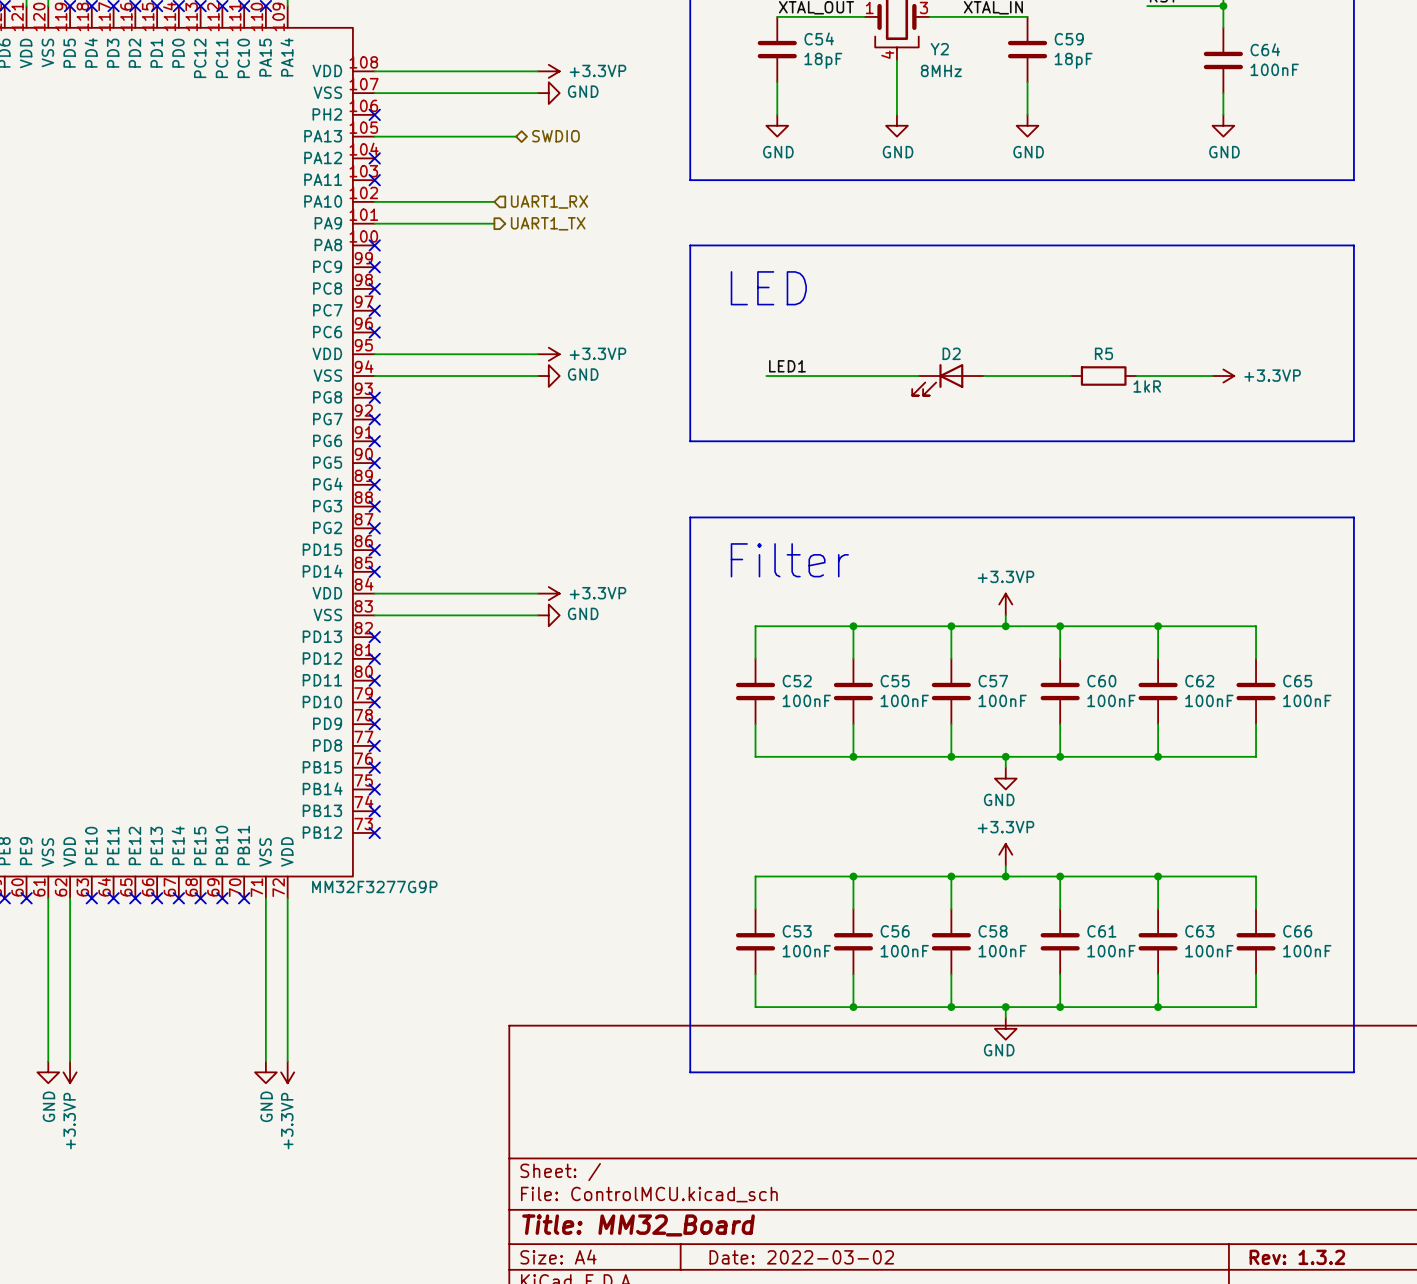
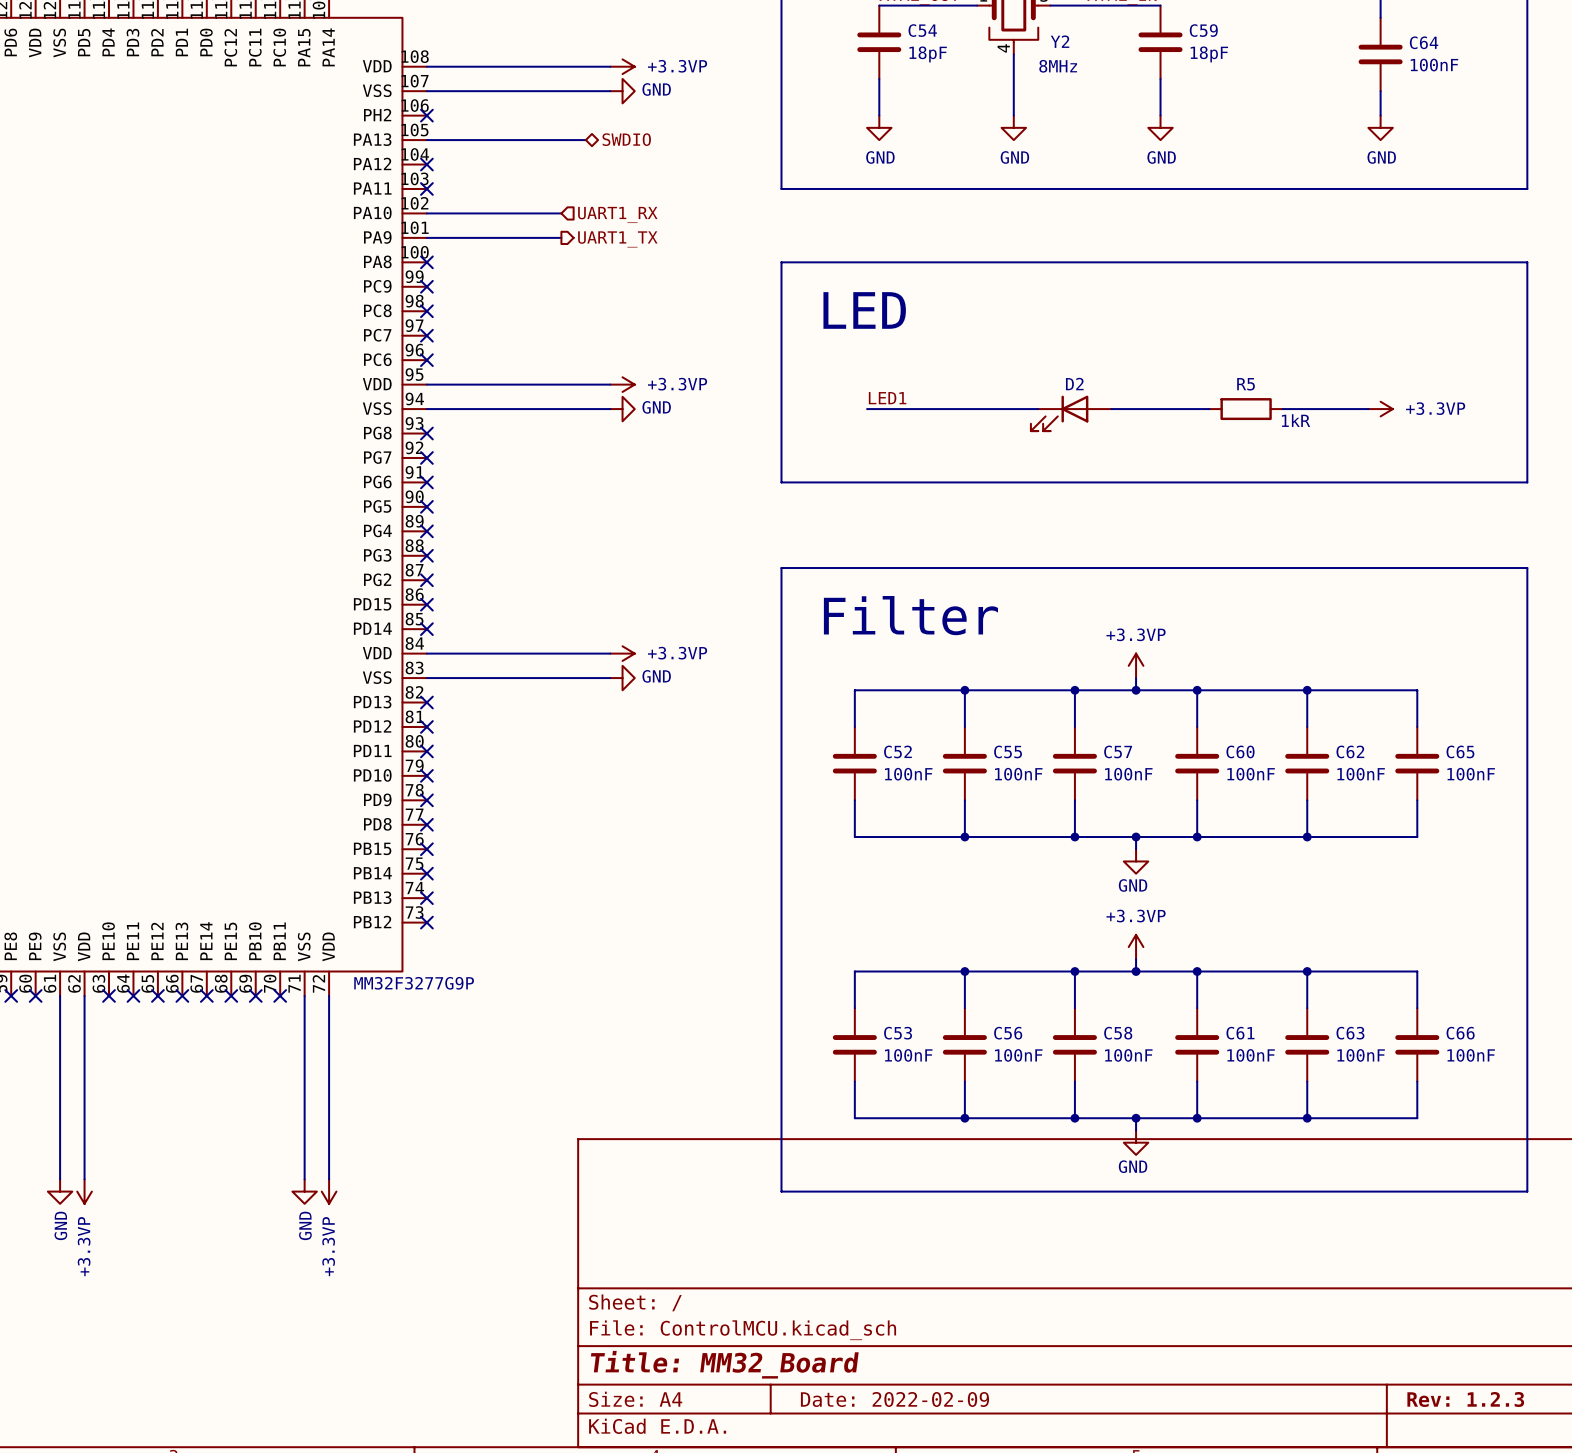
title block: Date: 2022-03-02 (801, 1257) -> Date: 2022-02-09 (894, 1399)
title block: Rev: 1.3.2 (1297, 1257) -> Rev: 1.2.3 (1465, 1399)

